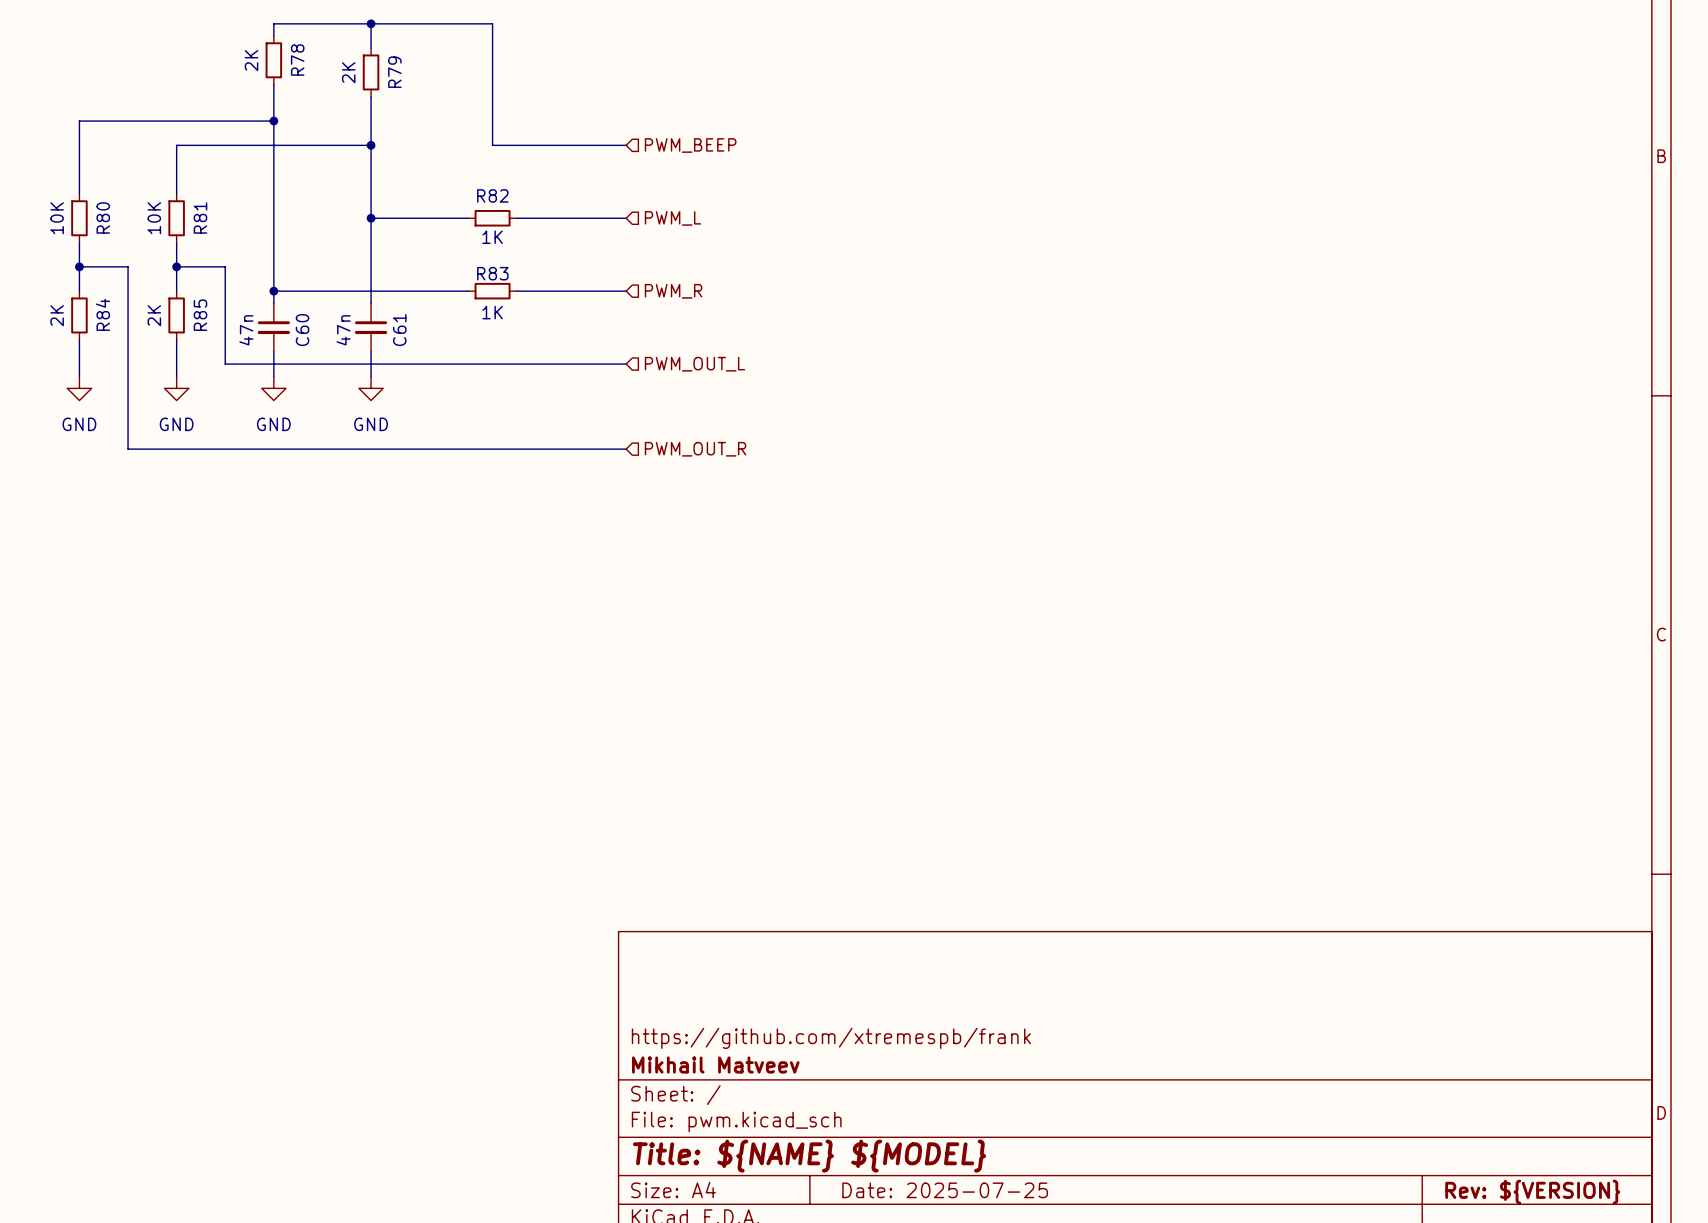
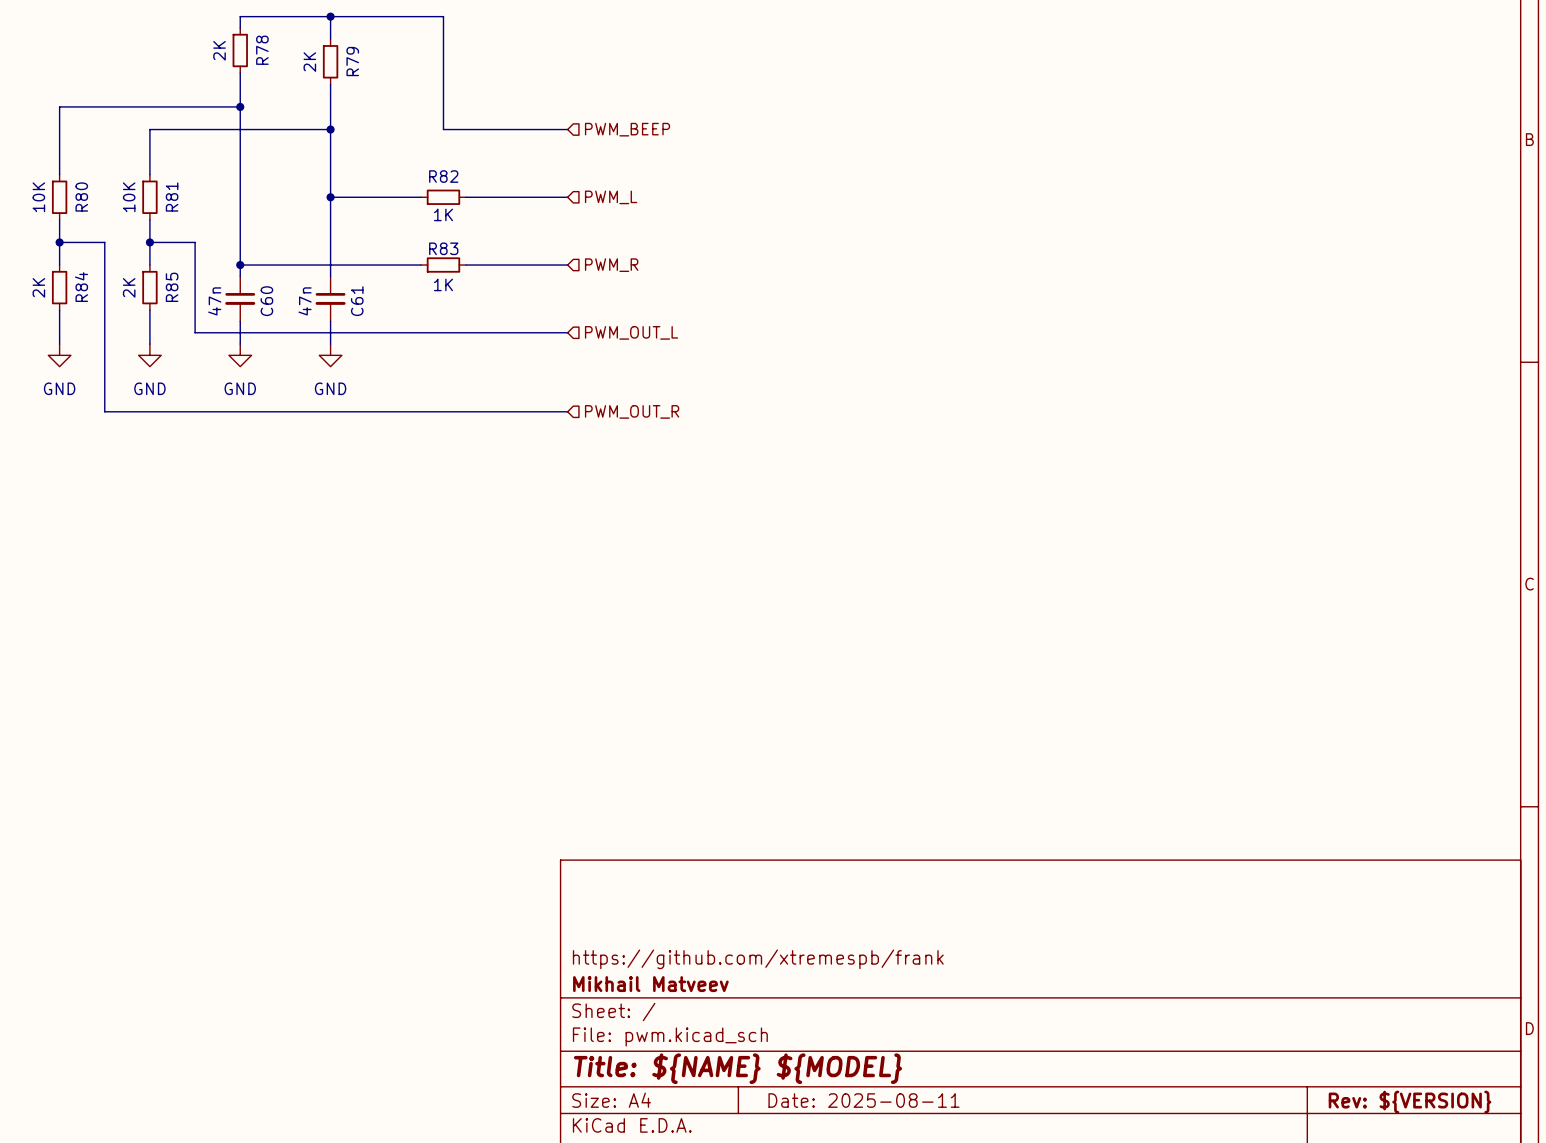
title block: Date: 2025-07-25 (945, 1190) -> Date: 2025-08-11 (864, 1100)

